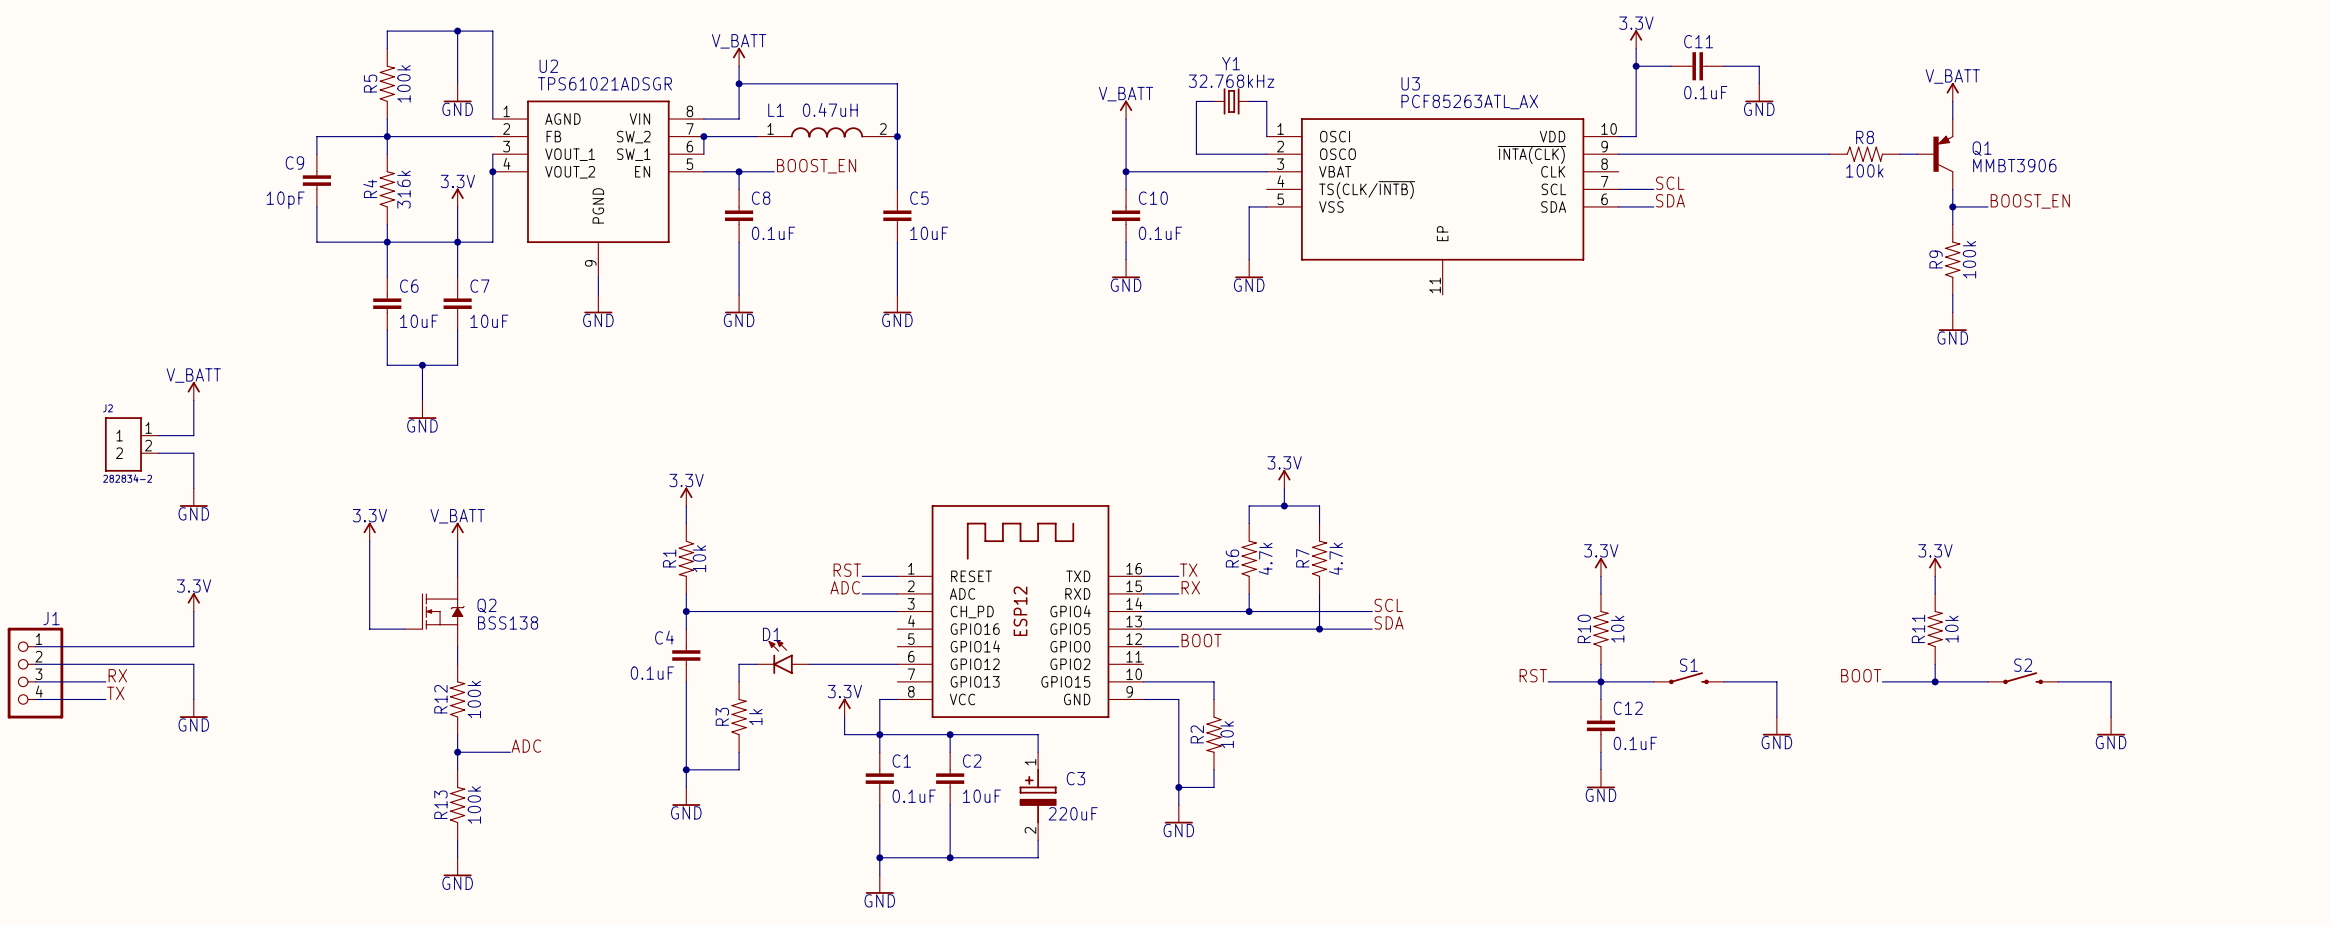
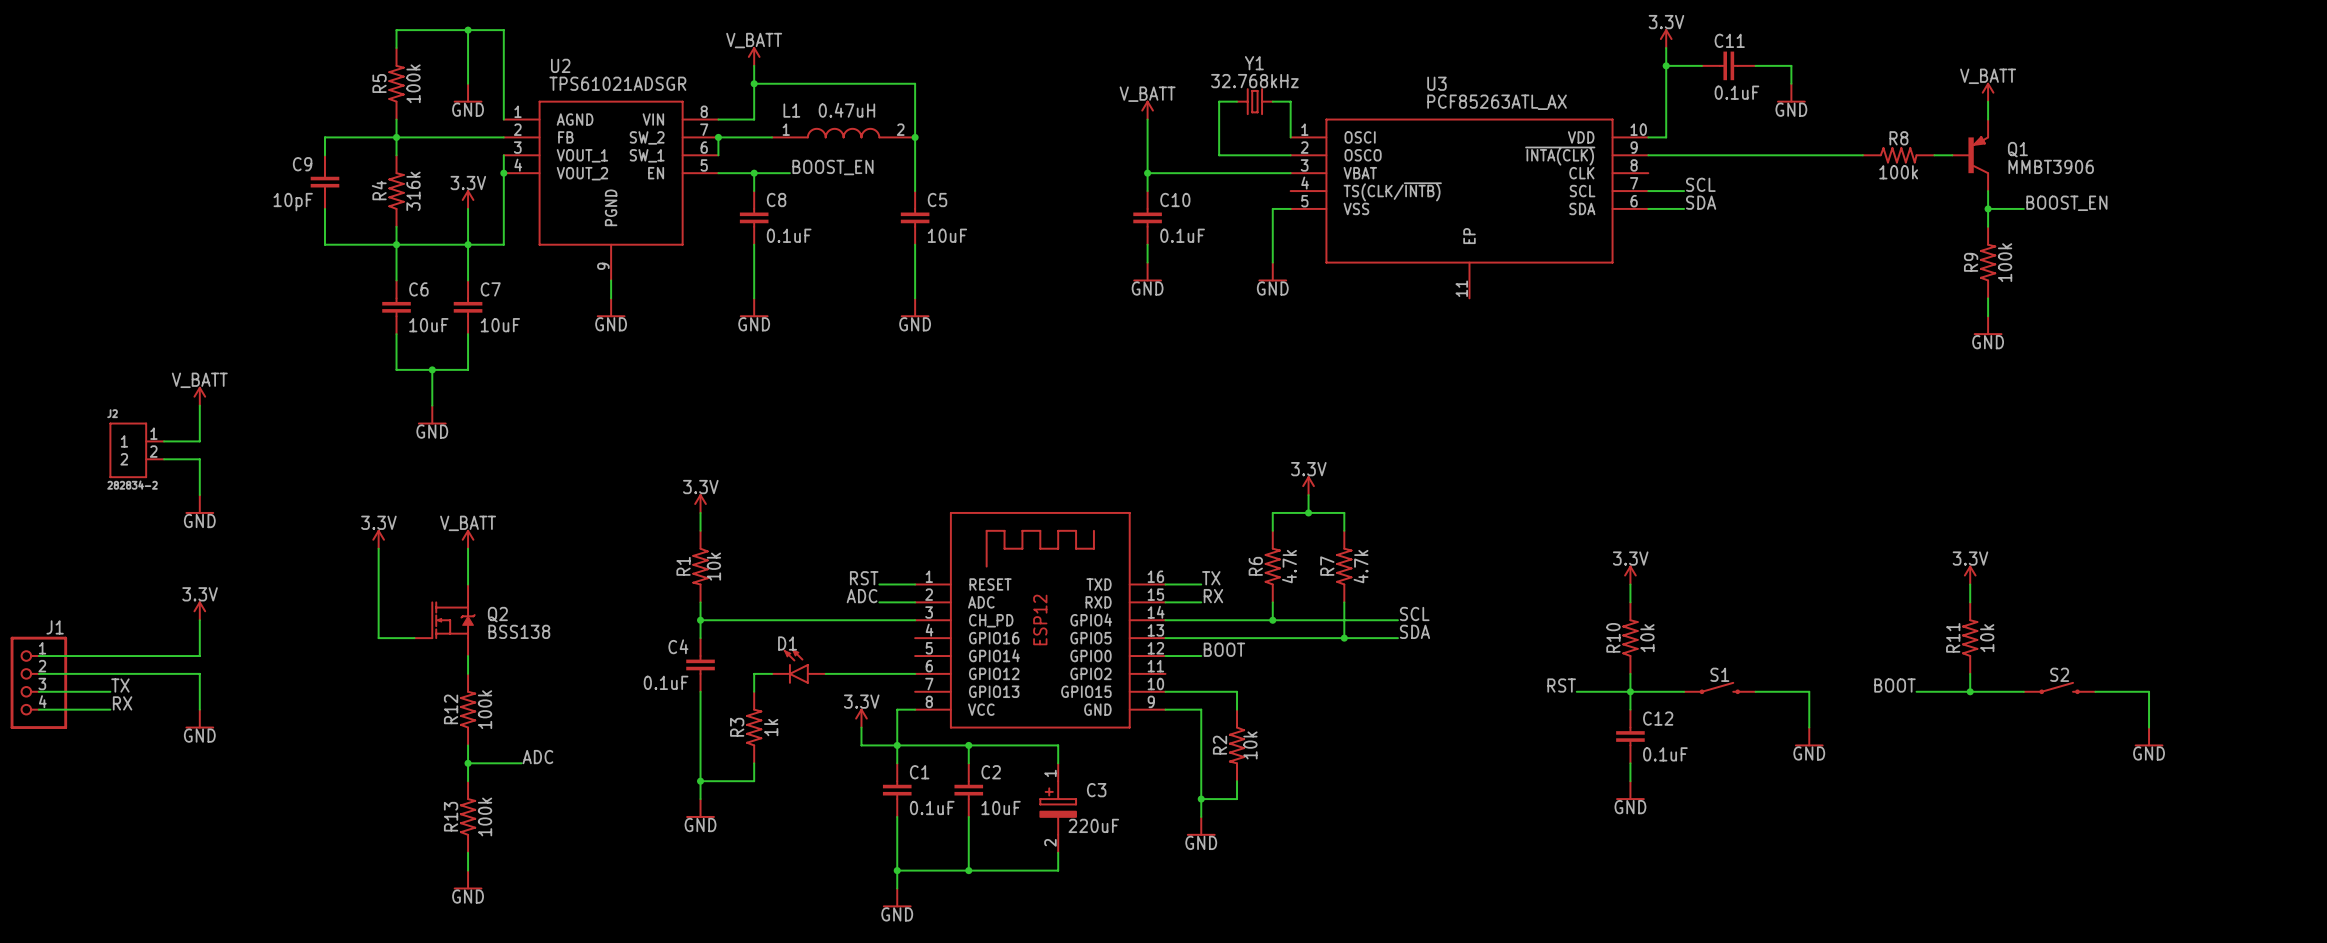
label: RX (117, 675) -> TX (120, 685)
label: TX (115, 693) -> RX (122, 703)

